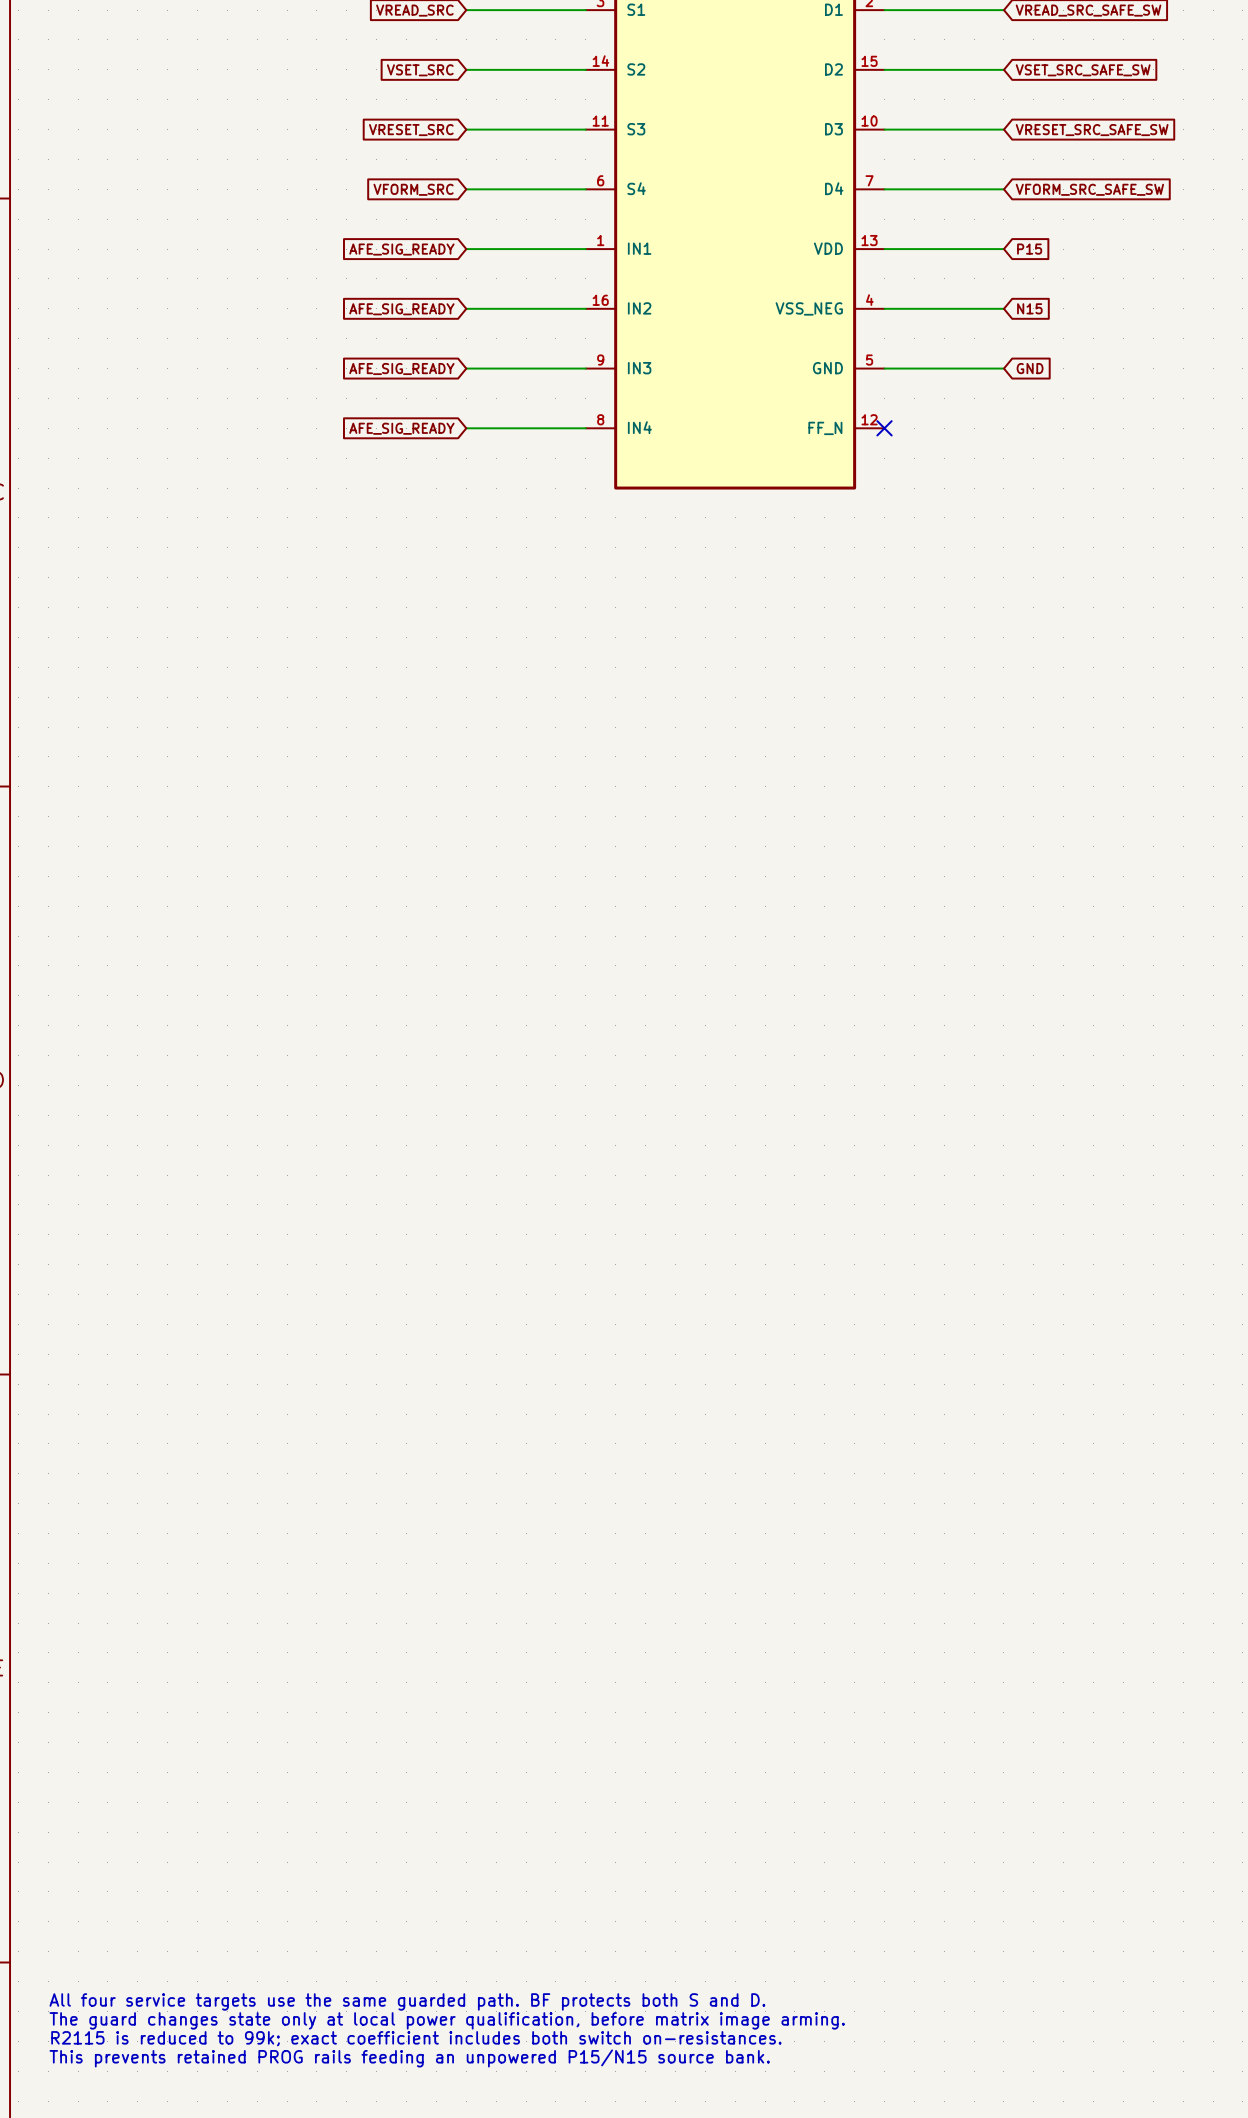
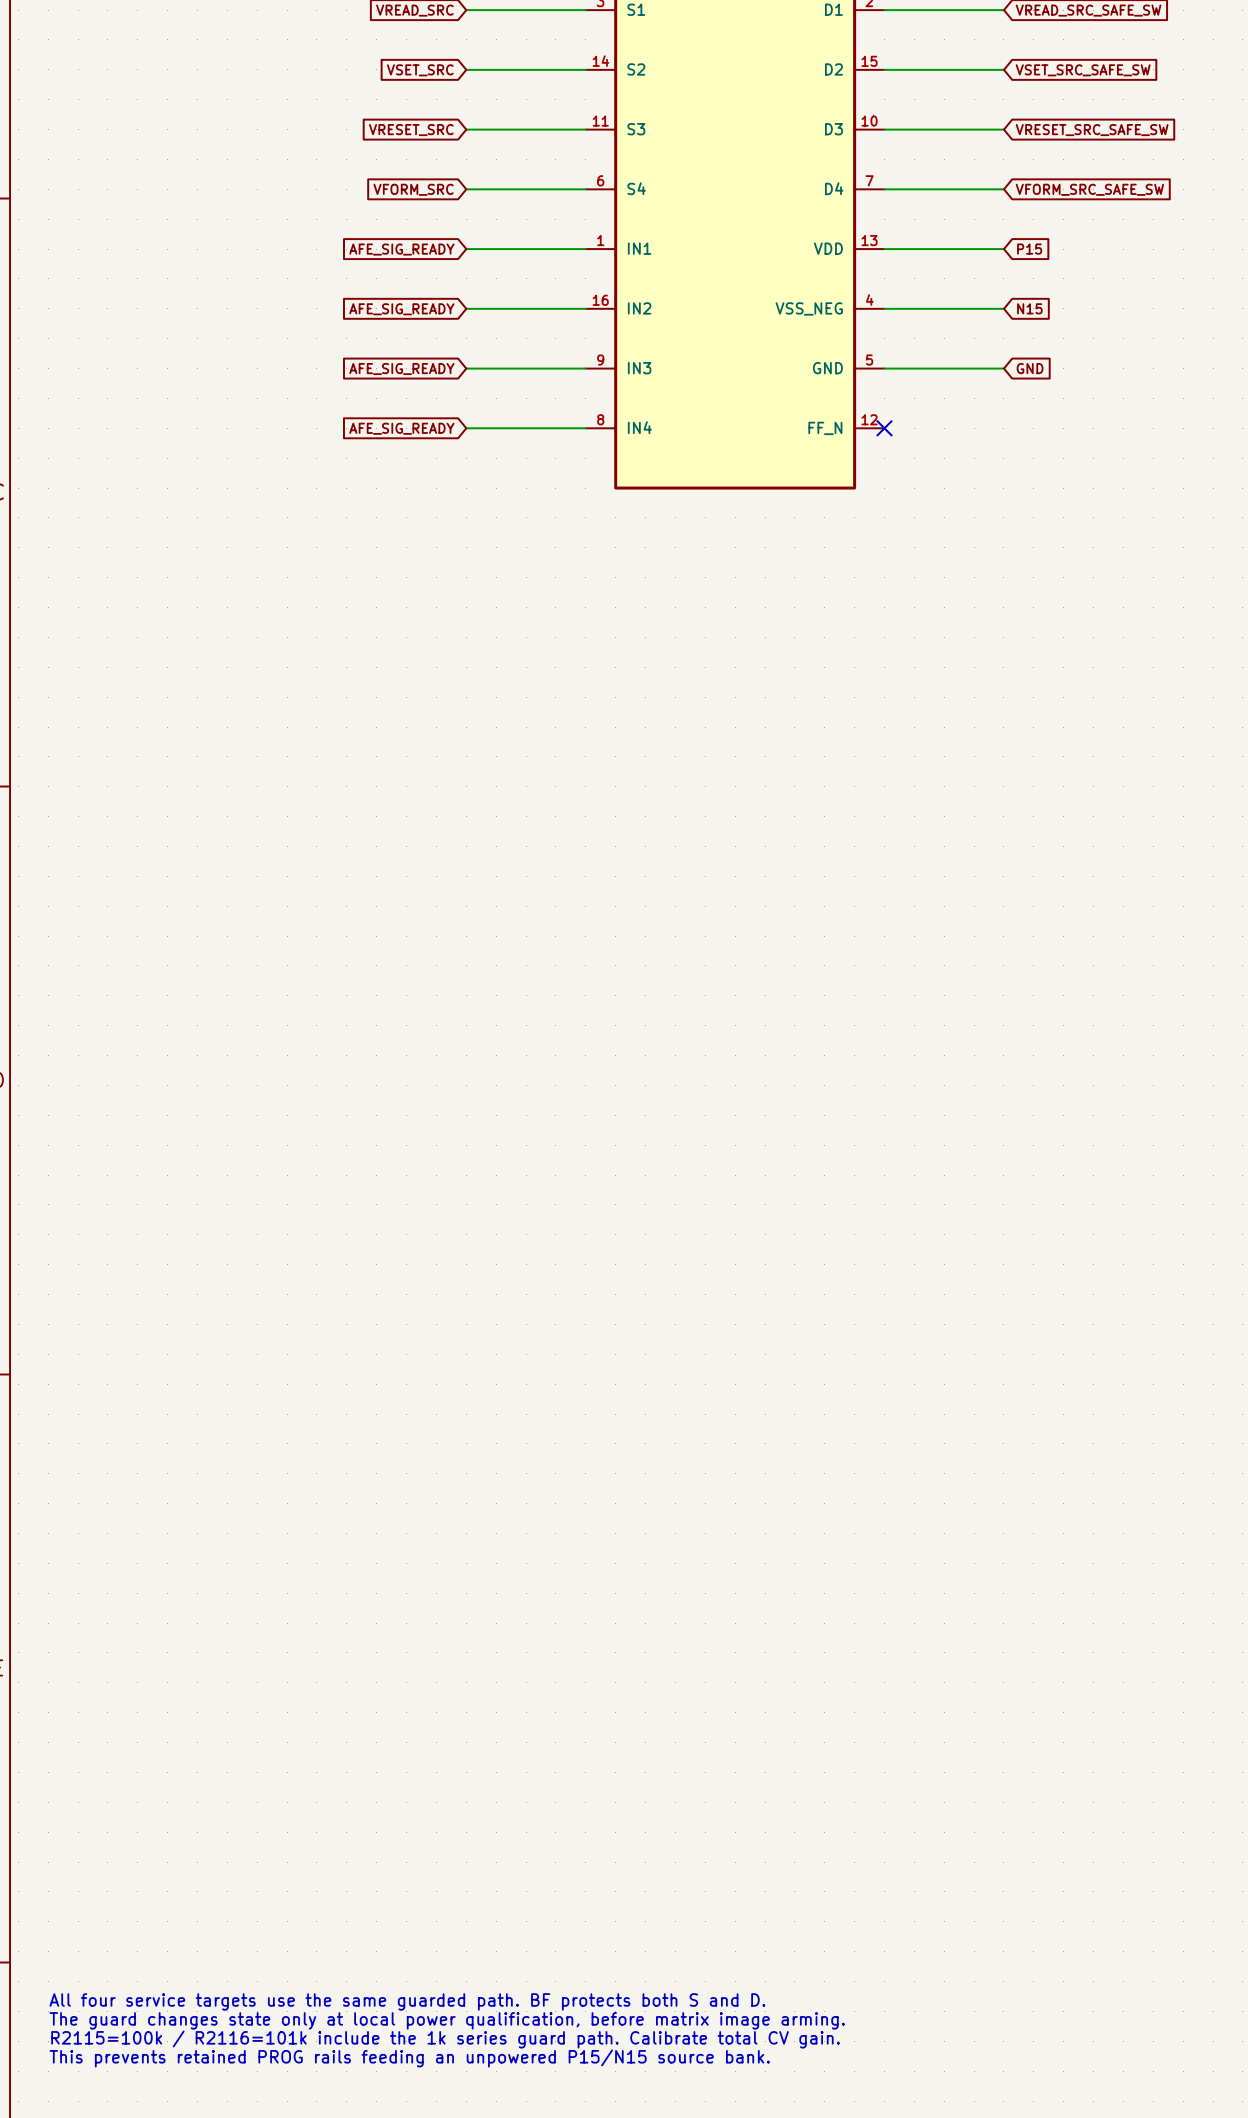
text: R2115 is reduced to 99k; exact coefficient includes both switch on-resistances. (416, 2038) -> R2115=100k / R2116=101k include the 1k series guard path. Calibrate total CV gain. (445, 2039)

